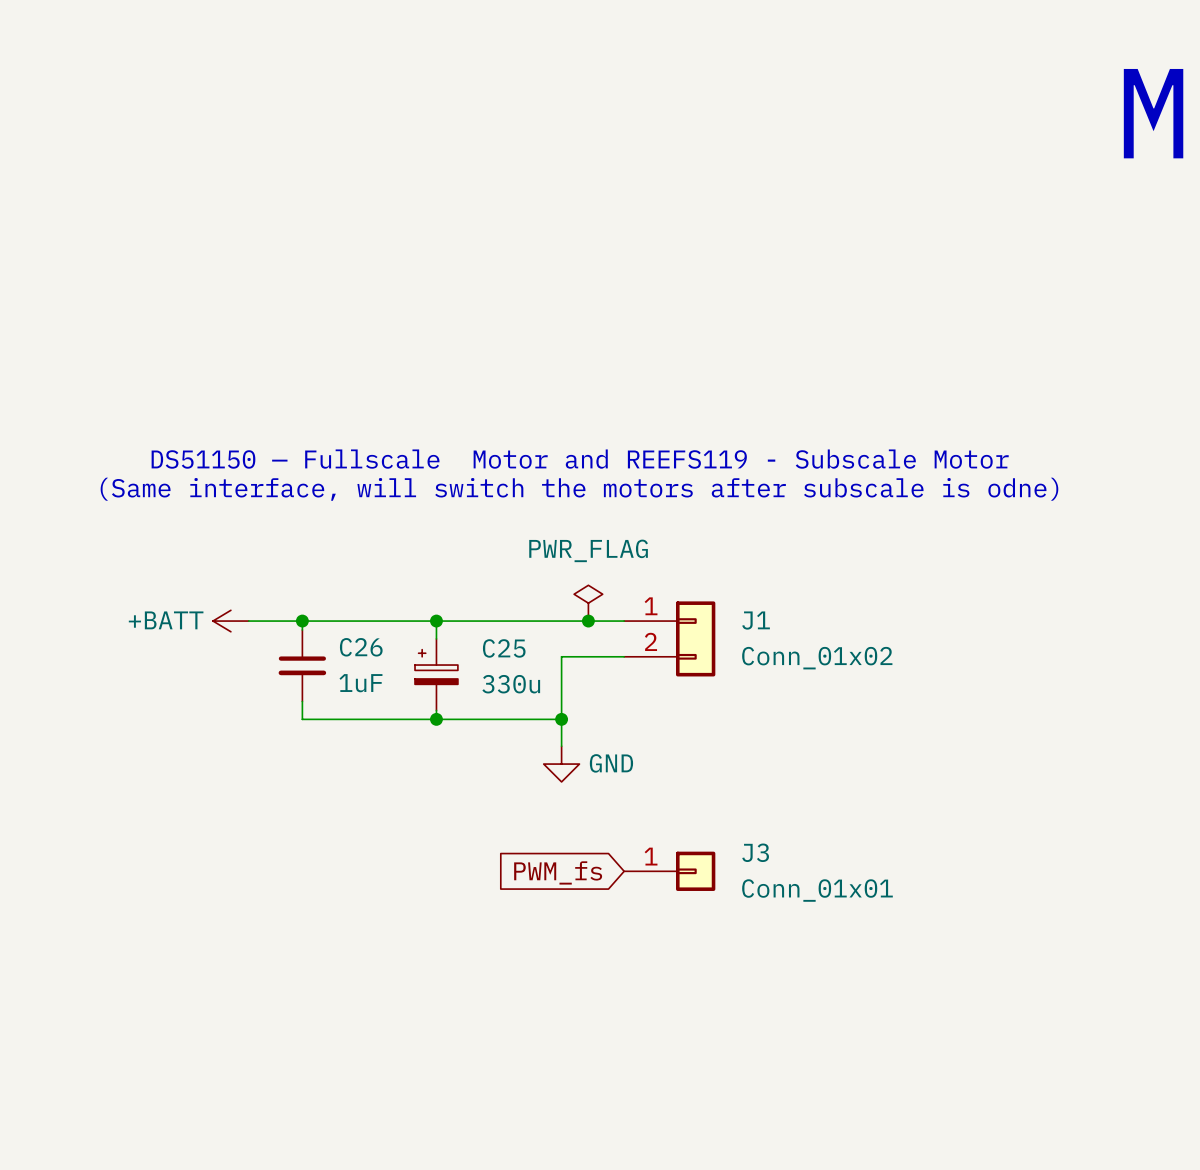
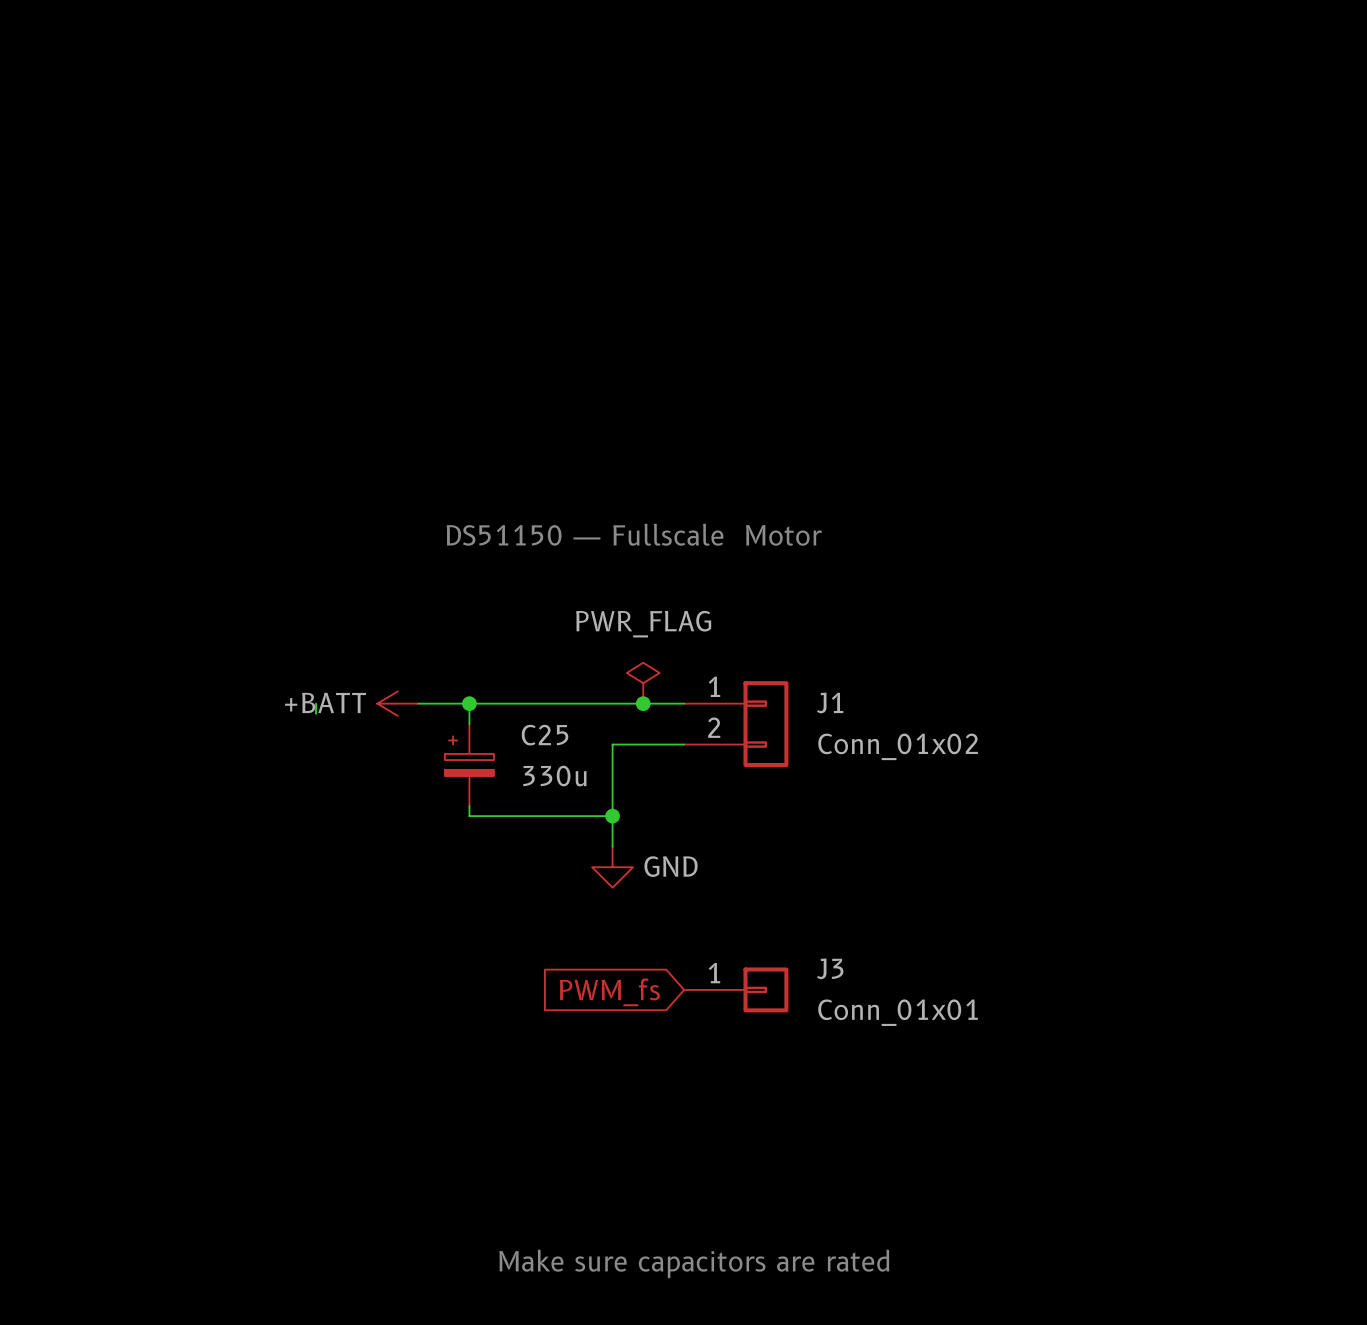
text: DS51150 — Fullscale Motor and REEFS119 - Subscale Motor (580, 459) -> DS51150 — Fullscale Motor (634, 534)
text: (Same interface, will switch the motors after subscale is odne) (579, 489) -> none
power symbol position: +BATT (230, 621) -> +BATT (397, 703)
wire: (248, 621) (391, 621) -> none
junction: (302, 621) -> none
C26: 1uF (302, 665) -> none
wire: (302, 701) (302, 719) (436, 719) -> none
junction: (436, 719) -> none
text: none -> Make sure capacitors are rated (694, 1263)

